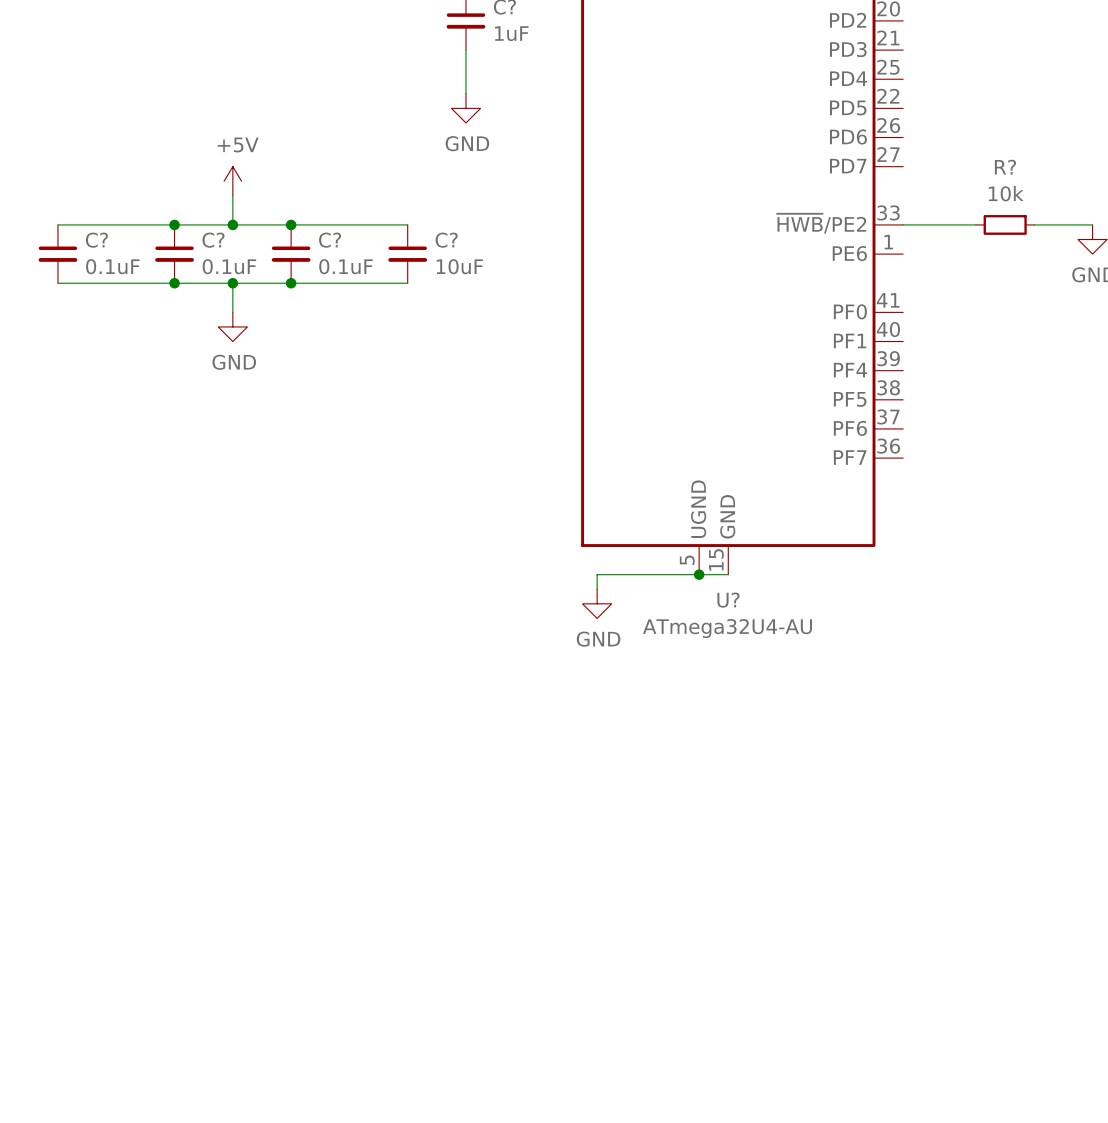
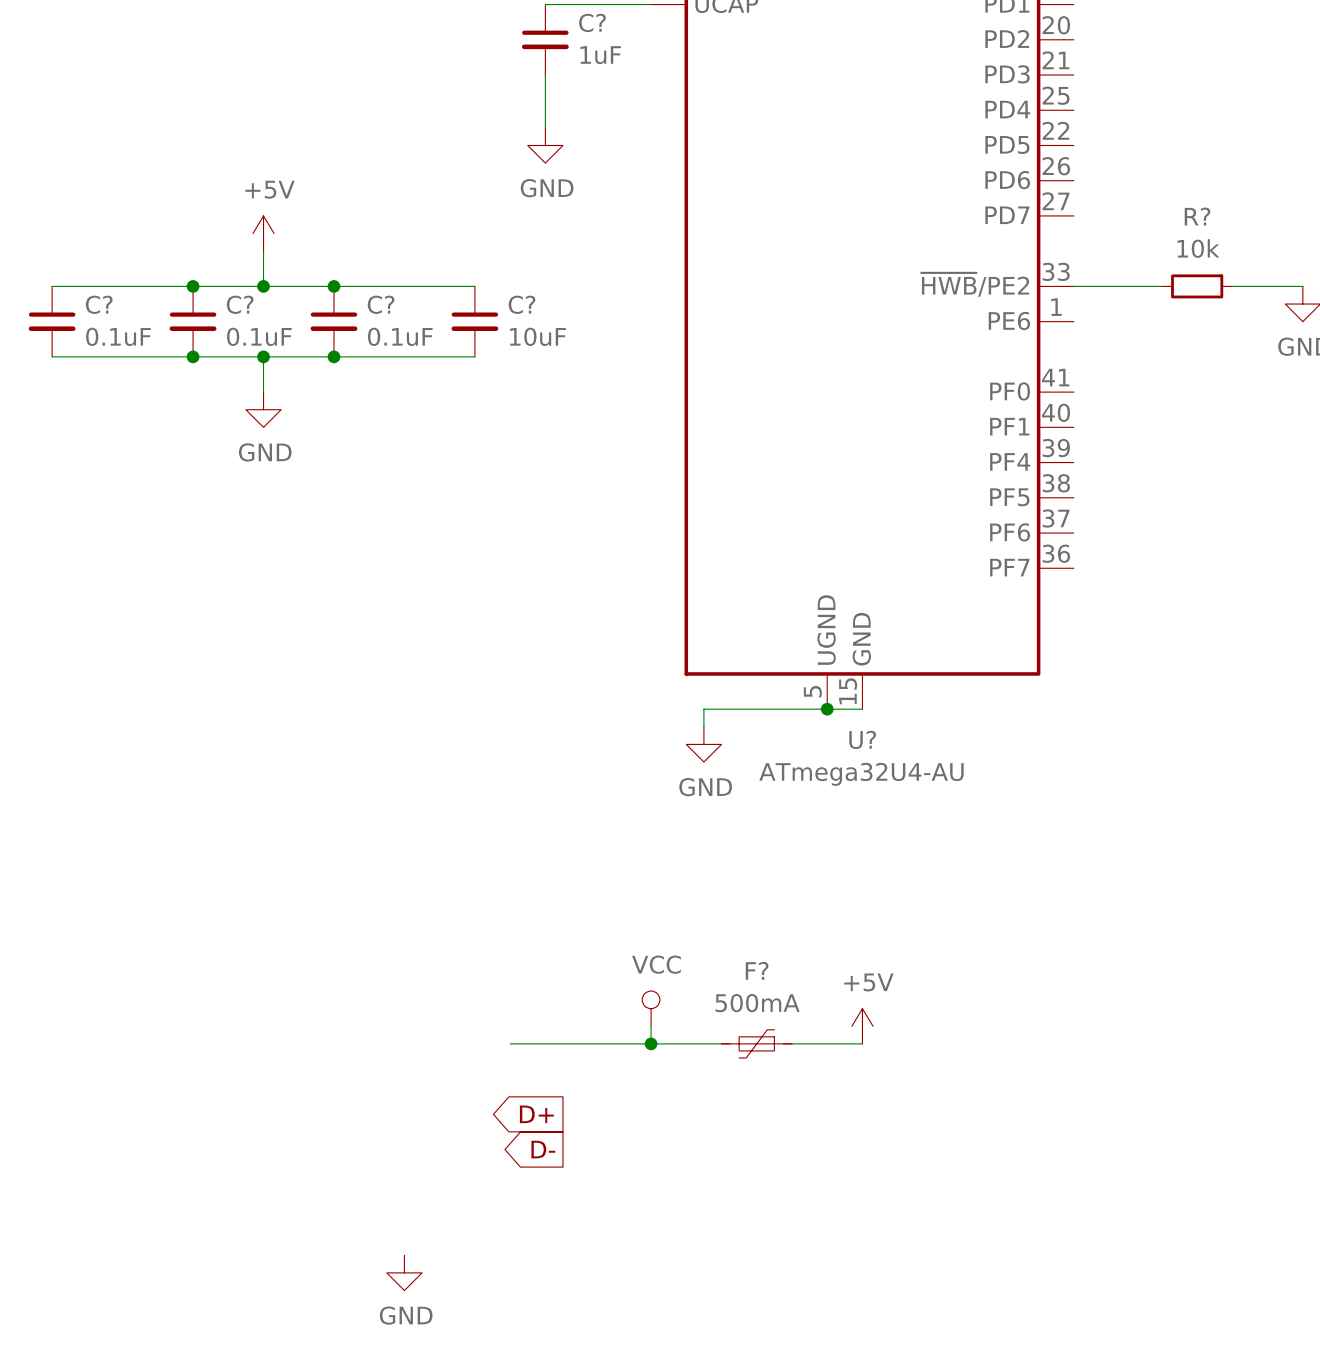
power symbol: none -> VCC (651, 1008)
wire: none -> (651, 1026) (651, 1043)
power symbol: none -> +5V (862, 1026)
wire: none -> (510, 1043) (721, 1043)
junction: none -> (651, 1043)
F?: none -> 500mA (756, 1043)
wire: none -> (791, 1043) (862, 1043)
global label: none -> D+ (536, 1114)
global label: none -> D- (543, 1149)
power symbol: none -> GND (404, 1272)

